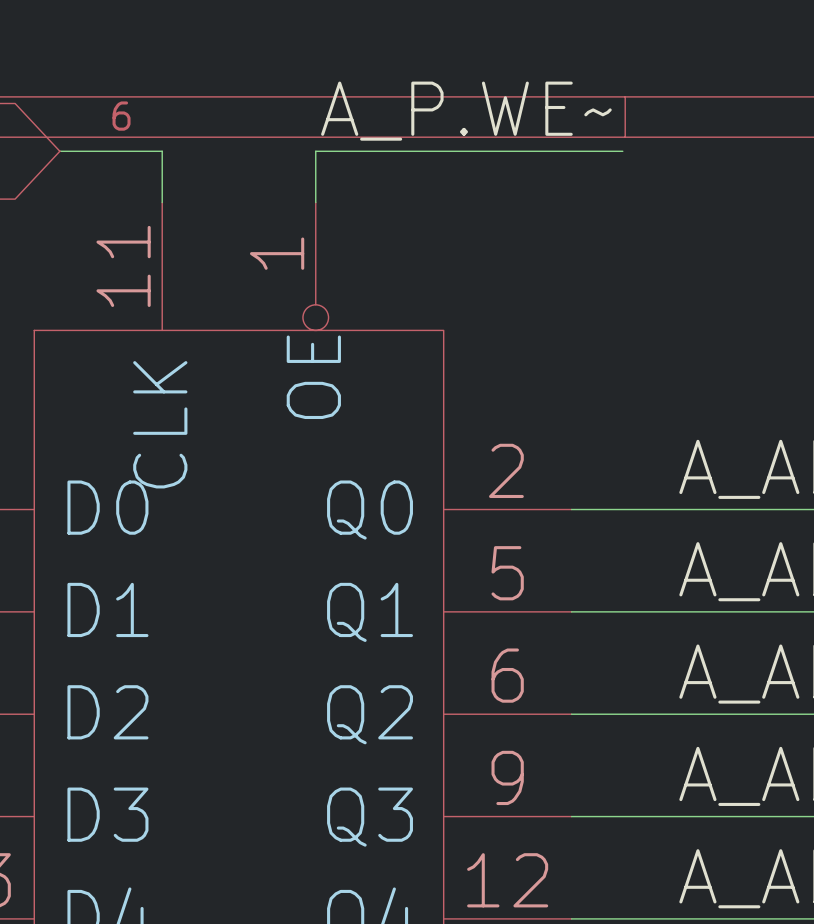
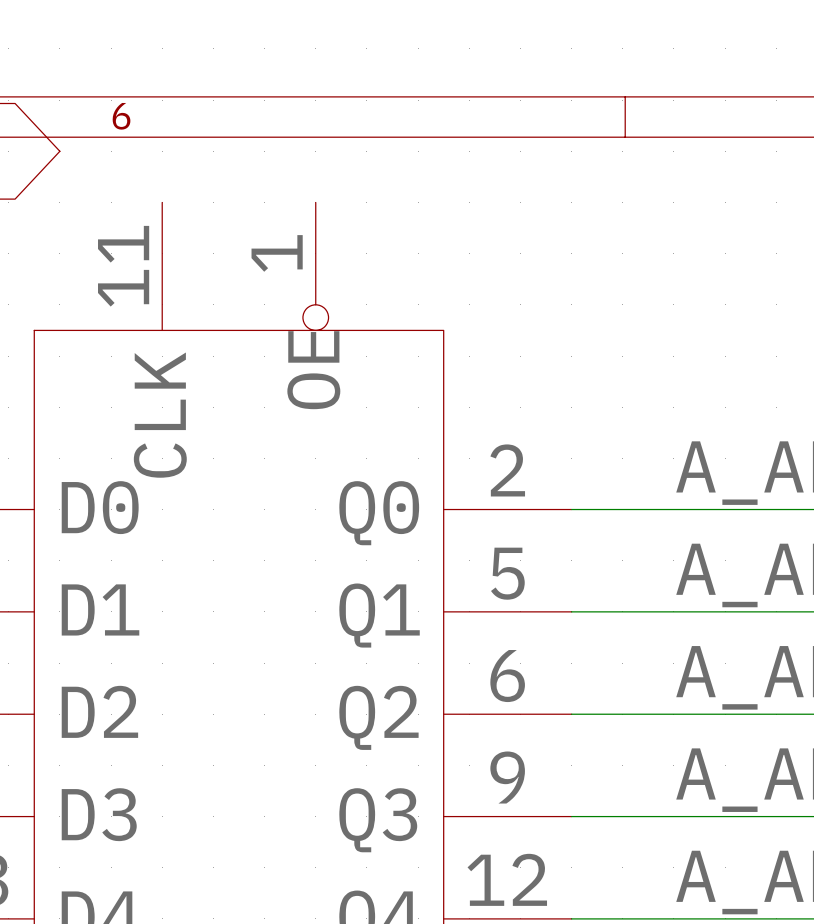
label: A_P.WE~ (466, 111) -> none
wire: (59, 151) (162, 151) (162, 202) -> none
wire: (622, 151) (315, 151) (315, 202) -> none

